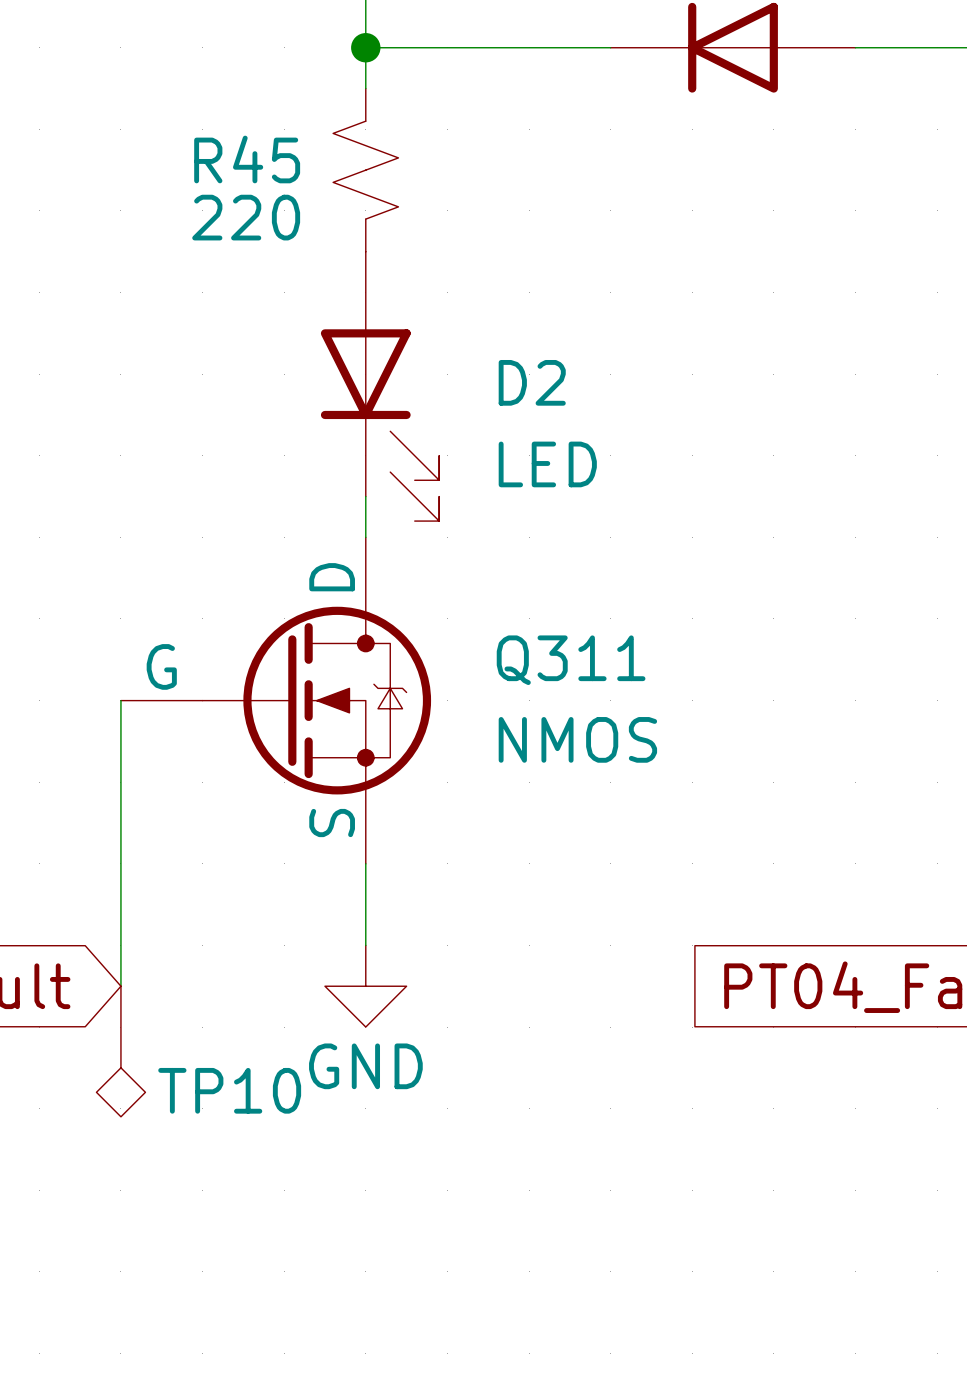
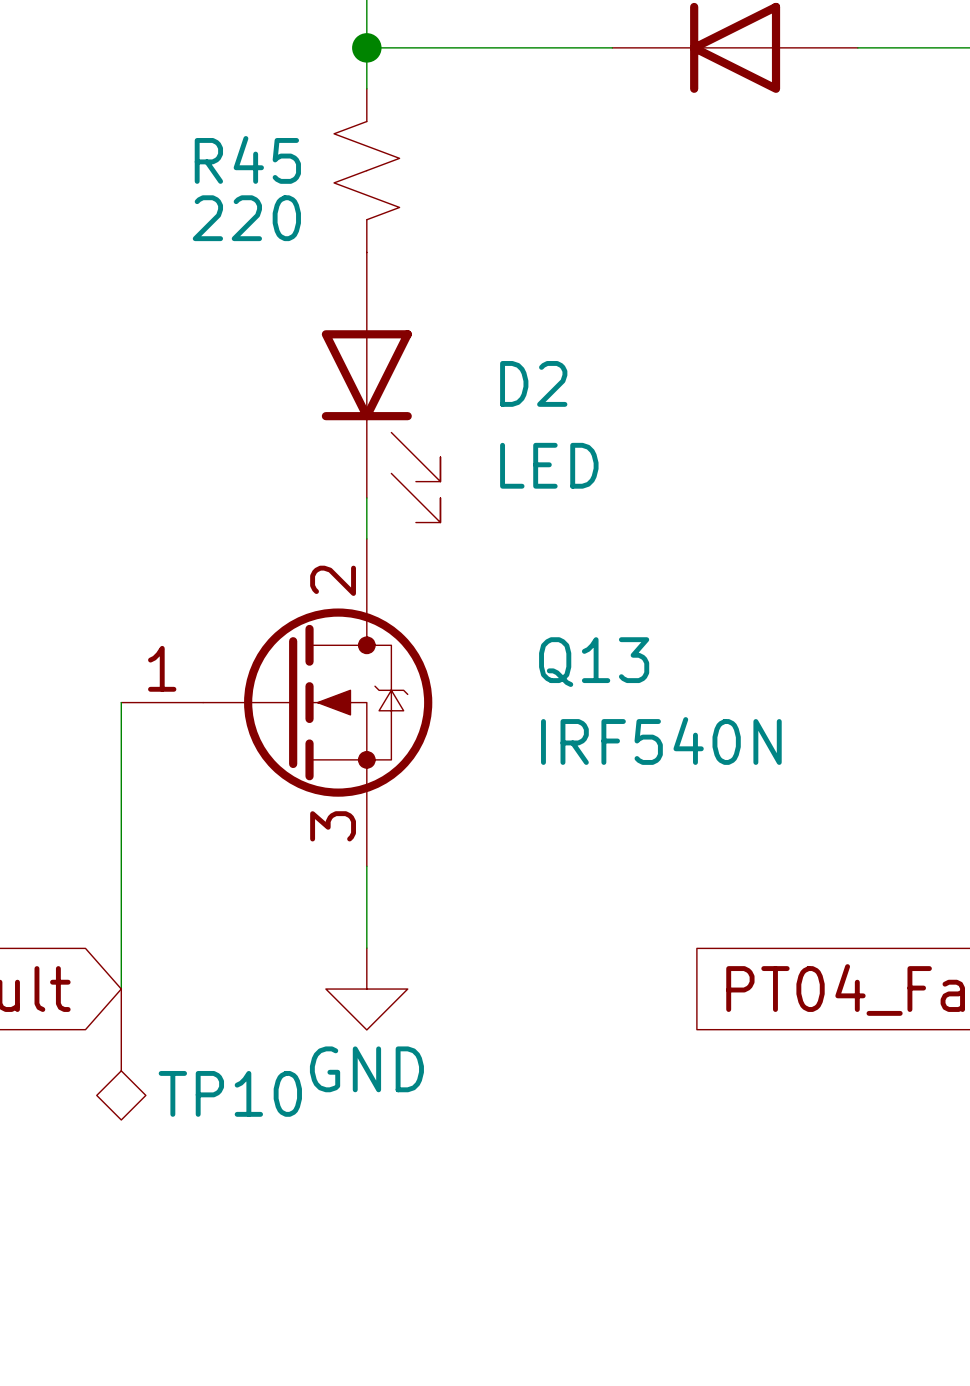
Q311 pin name: D (332, 577) -> none
Q311 pin number: none -> 2 (333, 580)
Q311 name: Q311 (571, 660) -> Q13 (594, 662)
Q311 pin name: G (161, 666) -> none
Q311 pin number: none -> 1 (162, 668)
Q311 value: NMOS (577, 739) -> IRF540N (661, 741)
Q311 pin name: S (332, 823) -> none
Q311 pin number: none -> 3 (333, 826)

